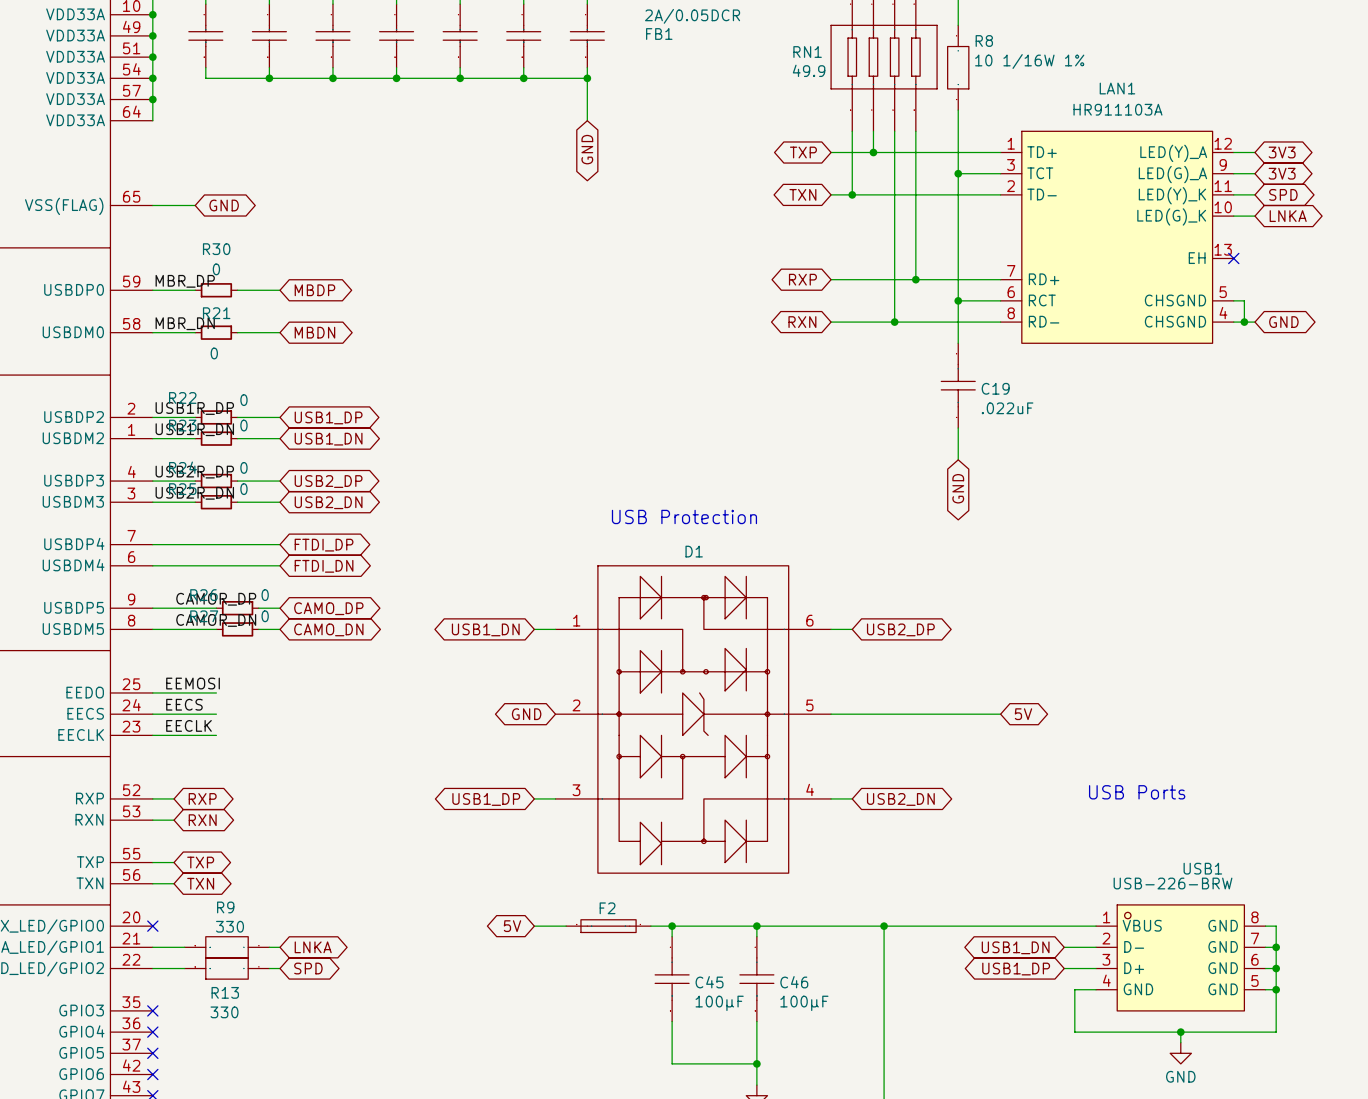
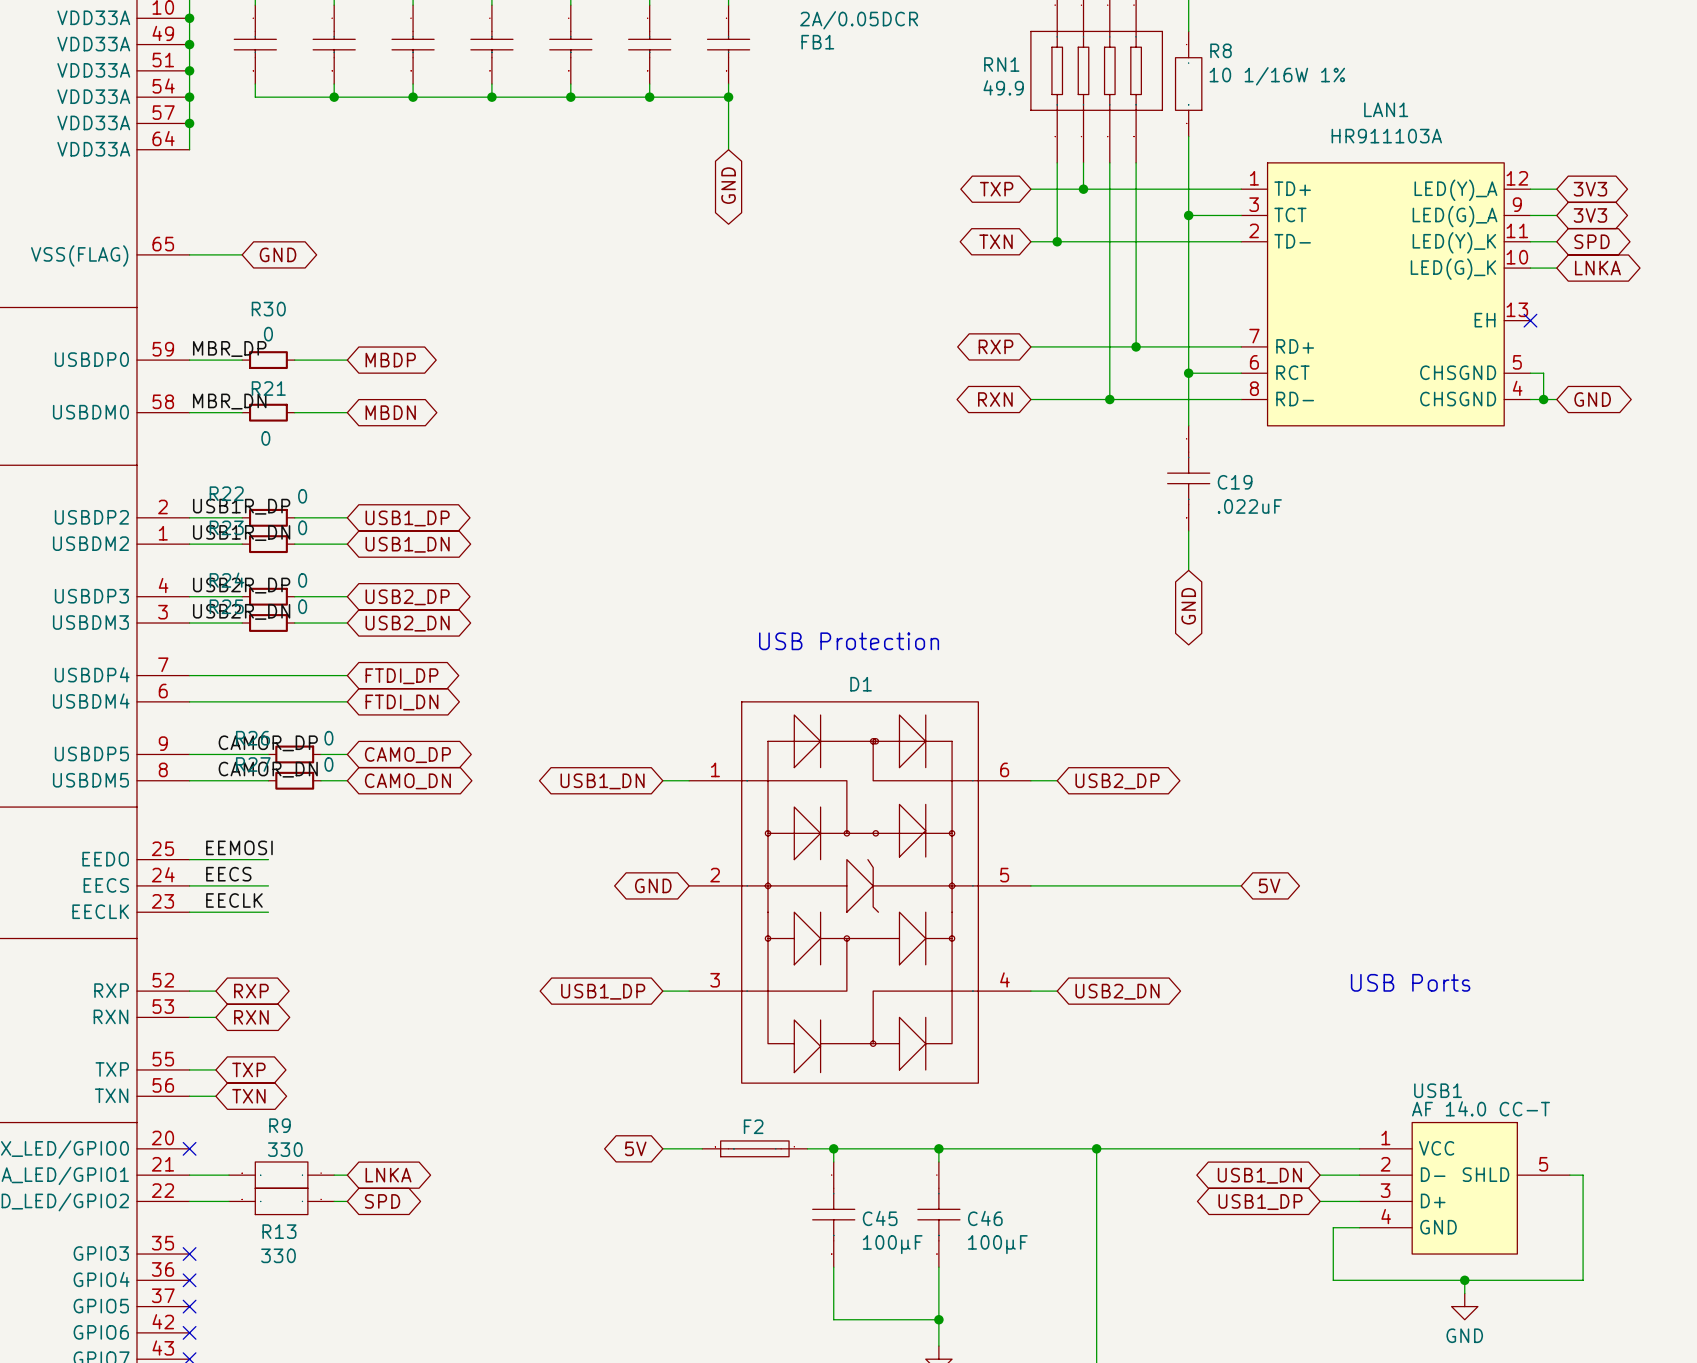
USB1 name position: USB1 (1202, 868) -> USB1 (1438, 1090)
USB1 value: USB-226-BRW (1173, 883) -> AF 14.0 CC-T (1480, 1108)
USB1 symbol: [1096, 904, 1266, 1011] -> [1359, 1122, 1570, 1255]
wire: (1265, 926) (1276, 926) (1276, 947) -> none
junction: (1276, 947) -> none
wire: (1265, 968) (1276, 968) -> none
junction: (1276, 968) -> none
wire: (1265, 989) (1276, 989) -> none
junction: (1276, 989) -> none

